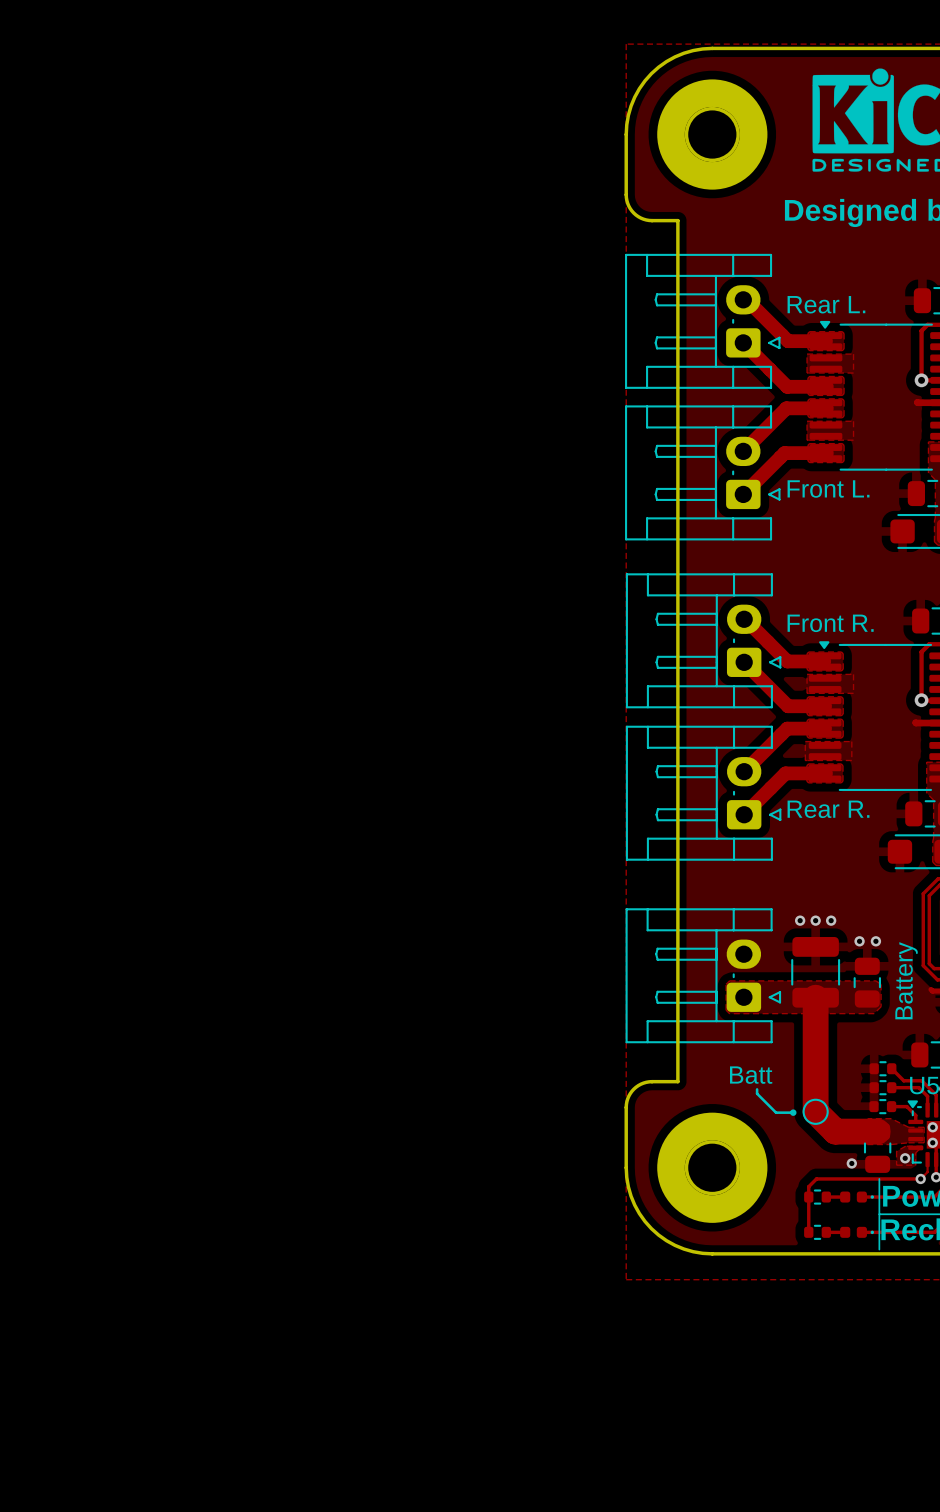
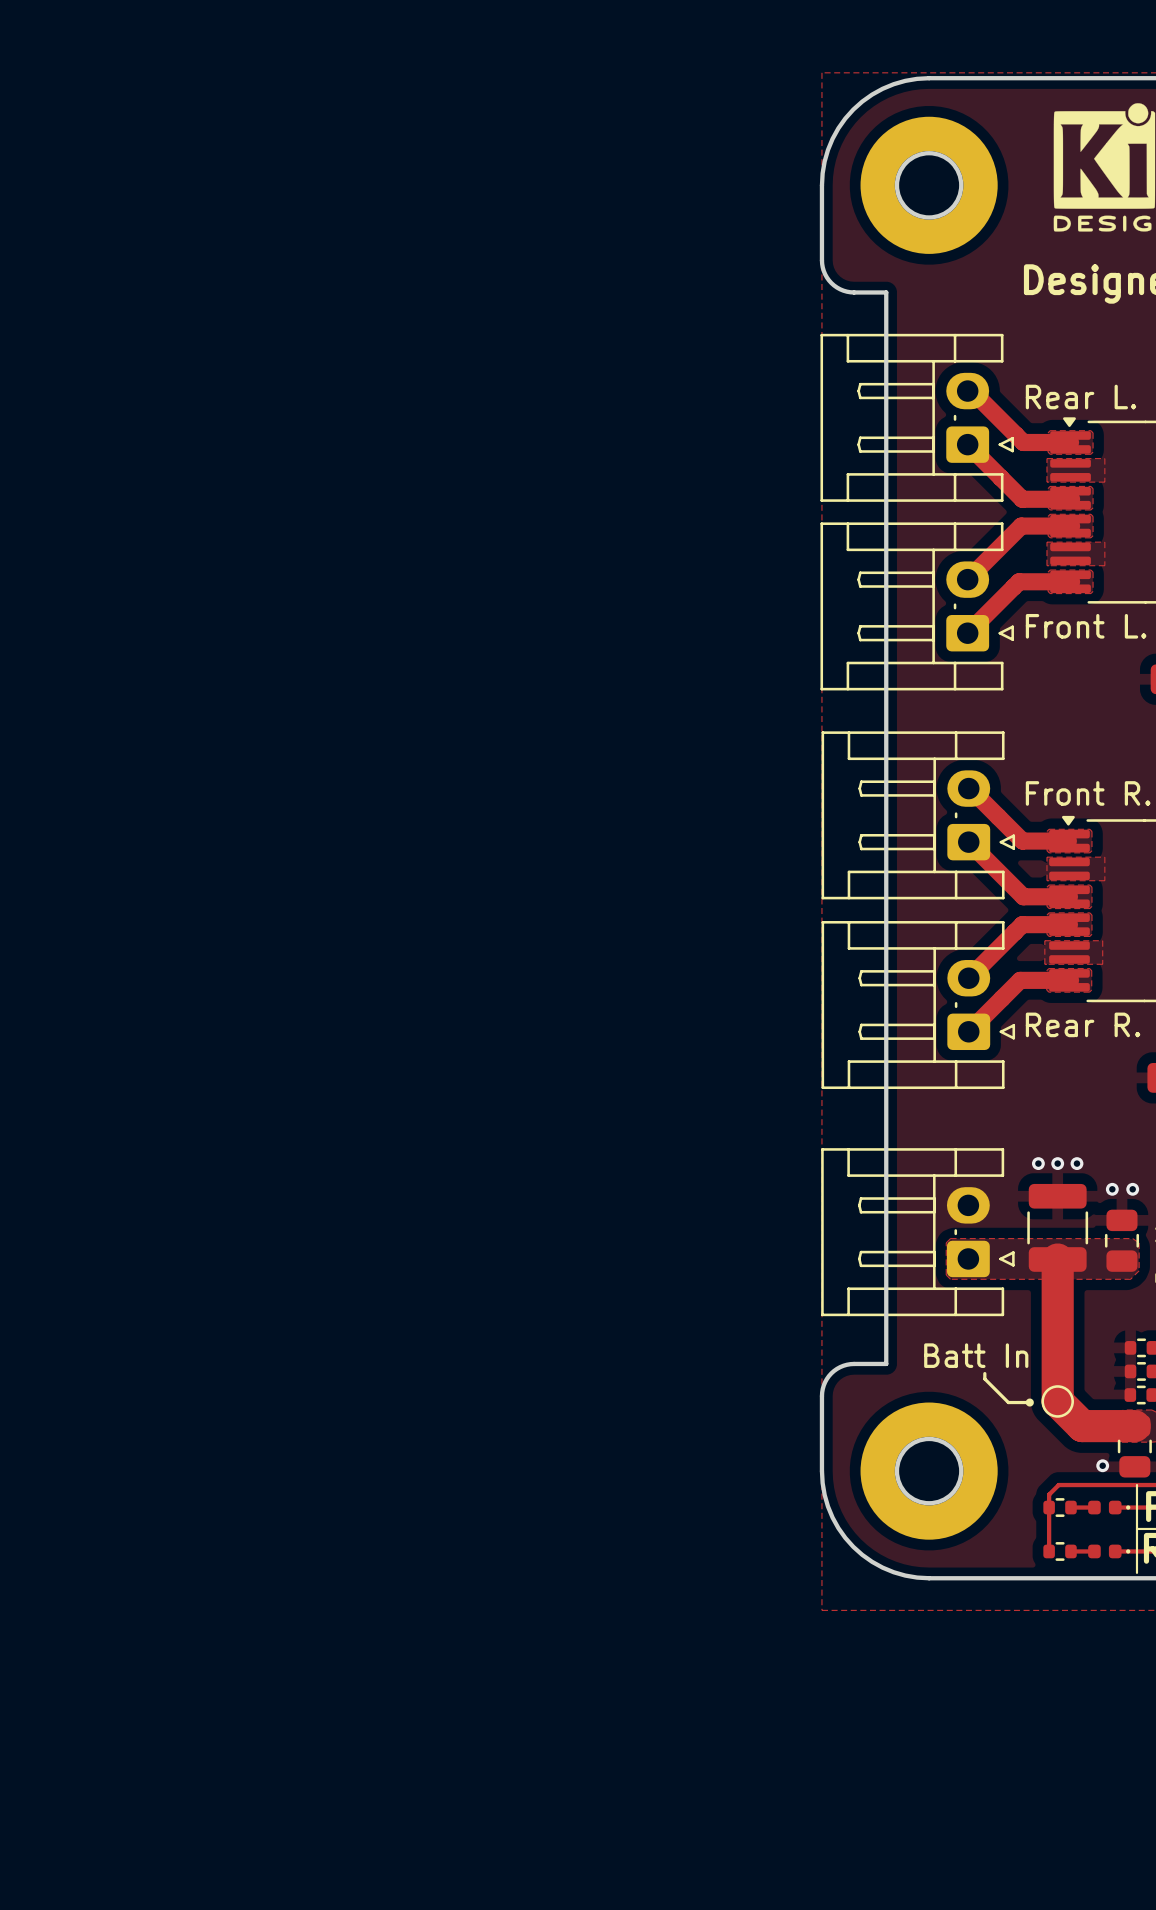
part value: Batt (751, 1075) -> Batt In (976, 1355)

